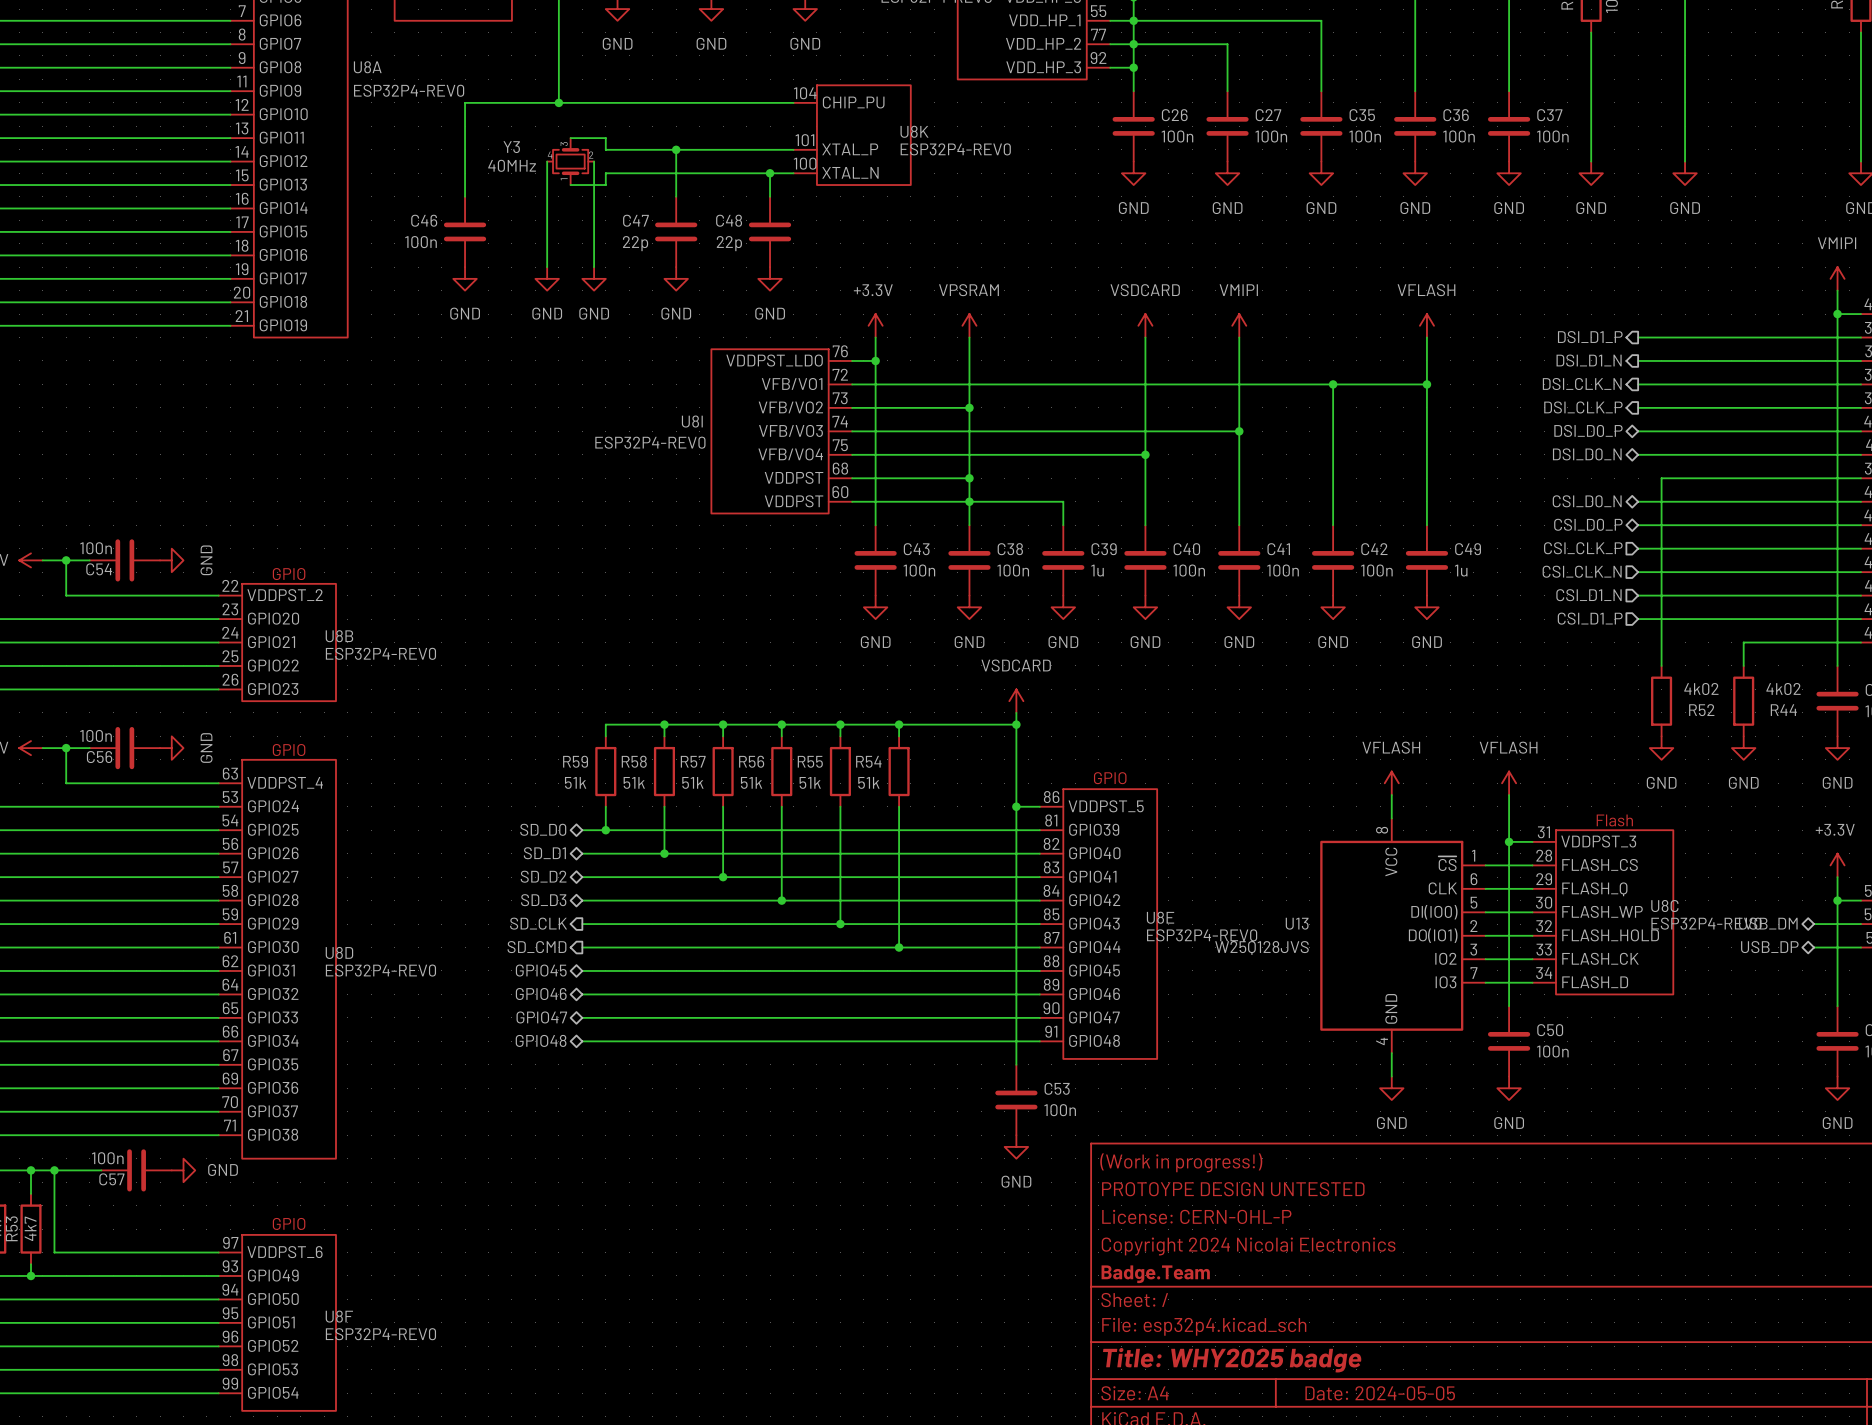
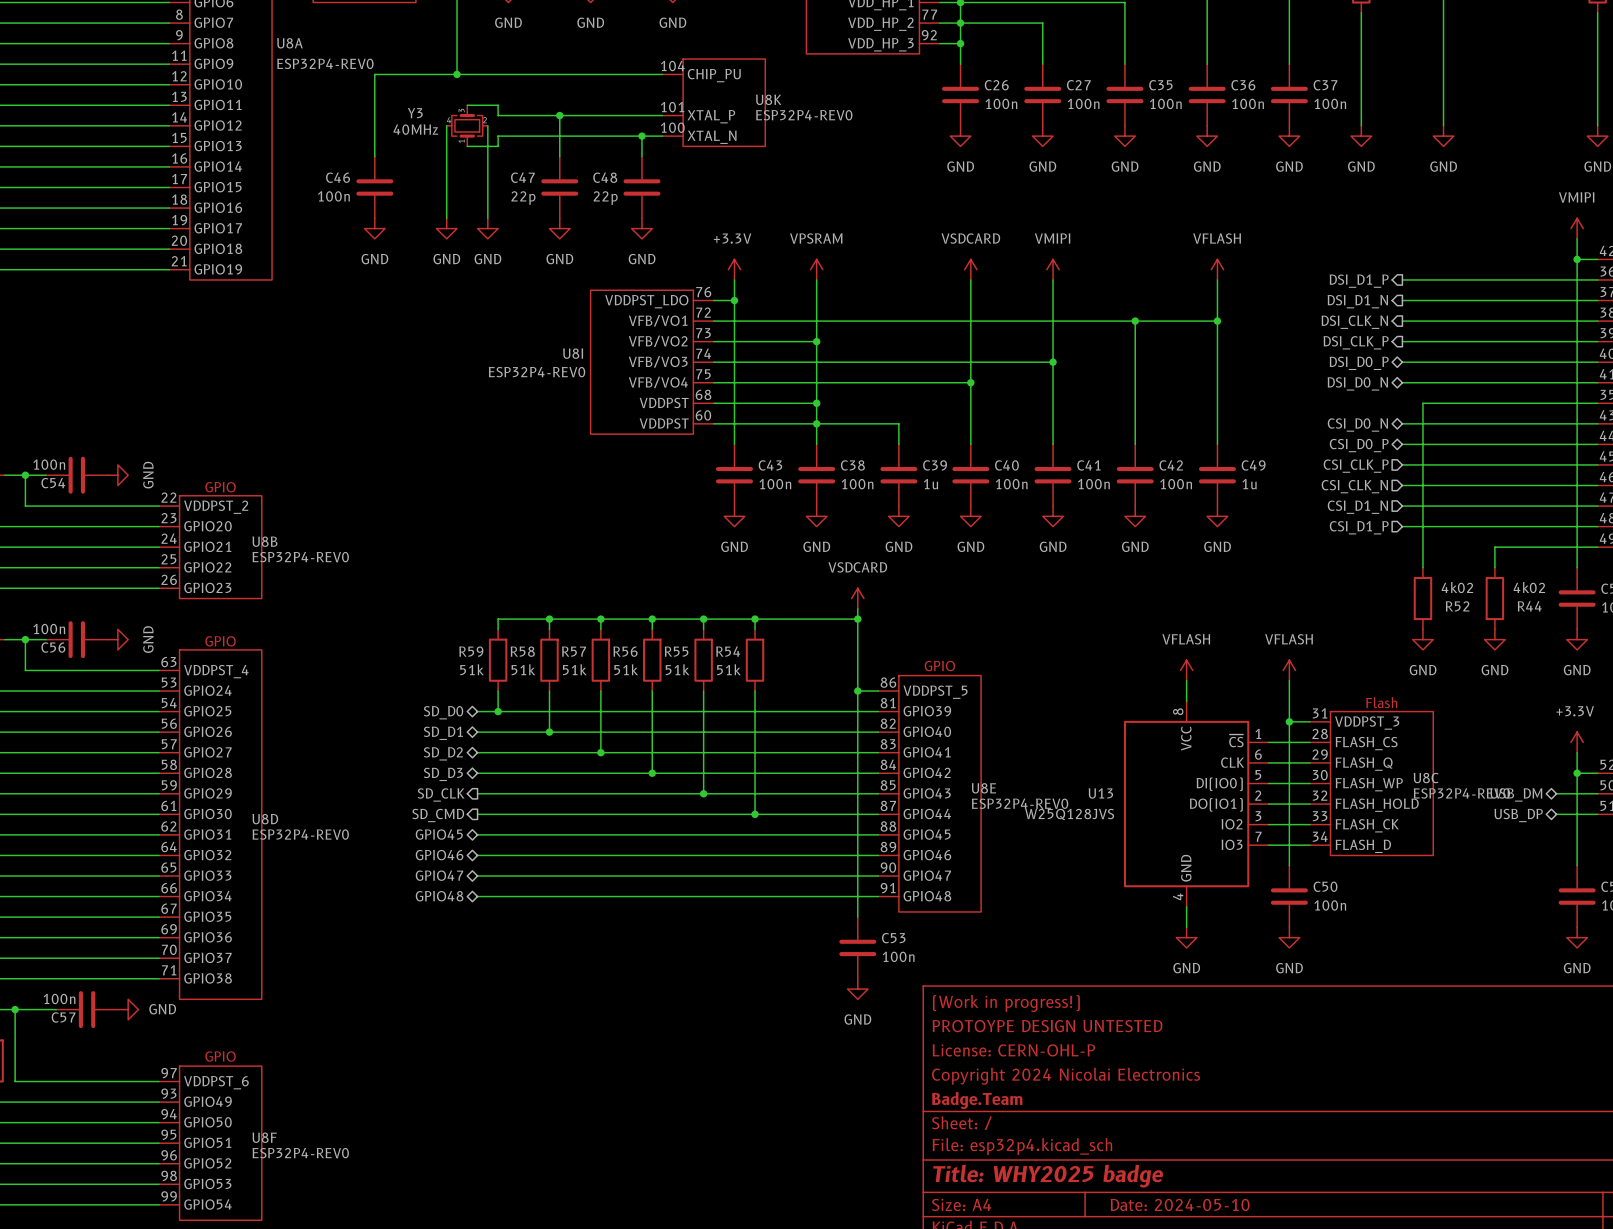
title block: Date: 2024-05-05 (1380, 1393) -> Date: 2024-05-10 (1180, 1204)

